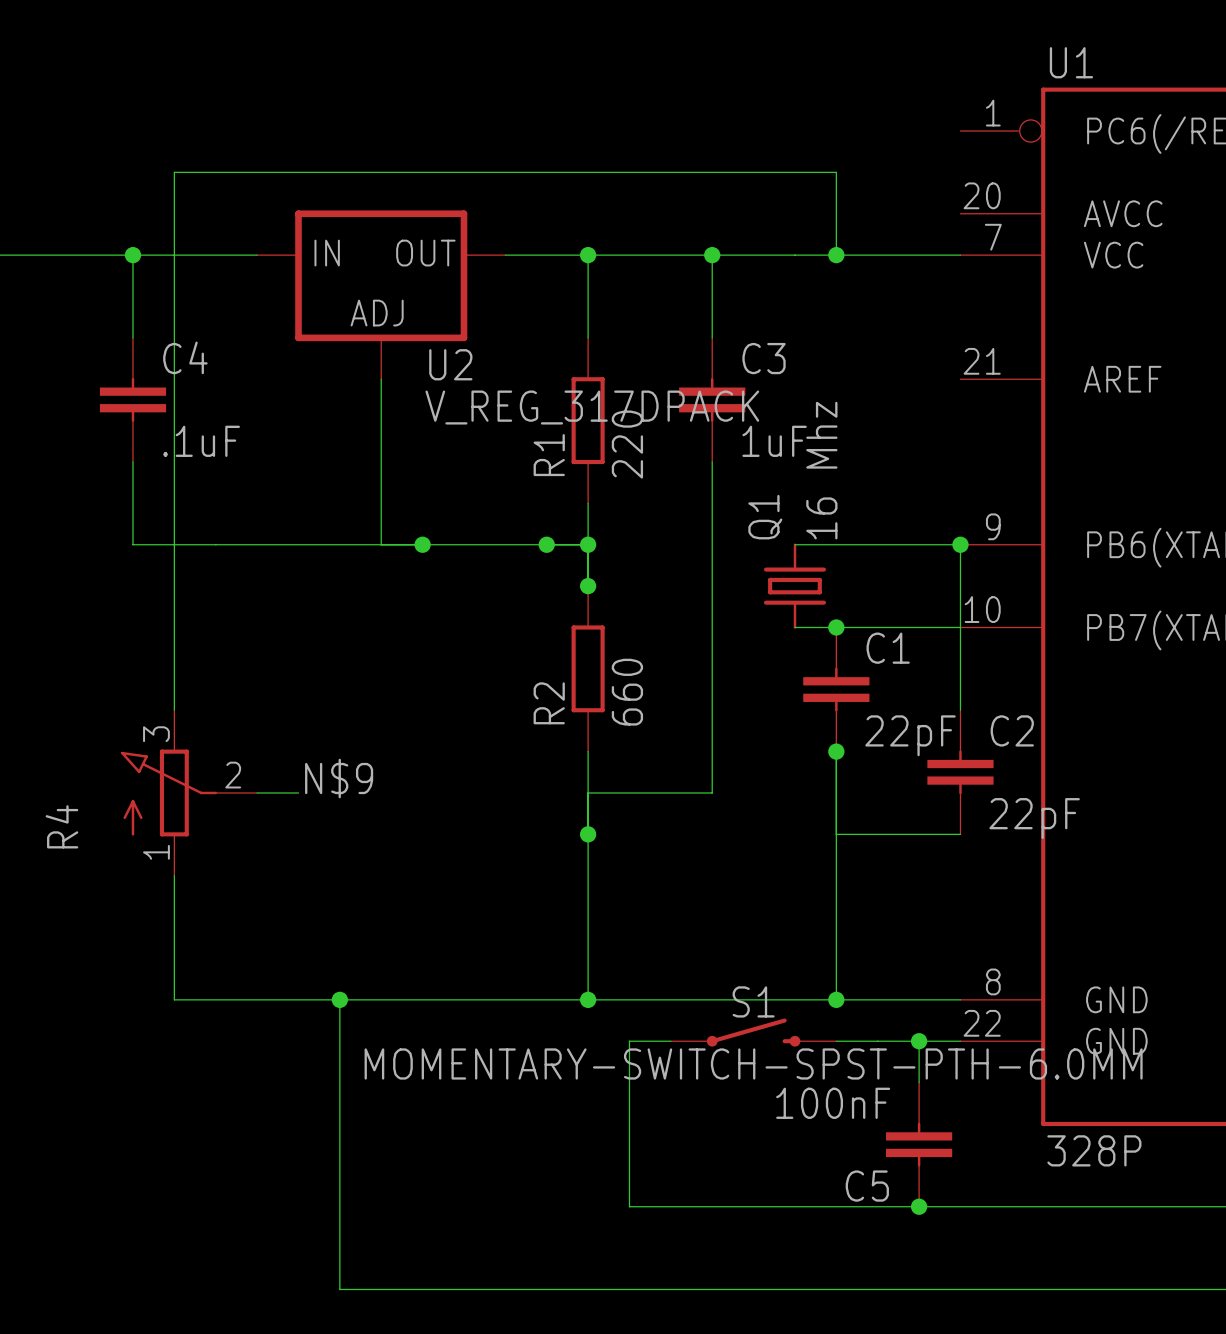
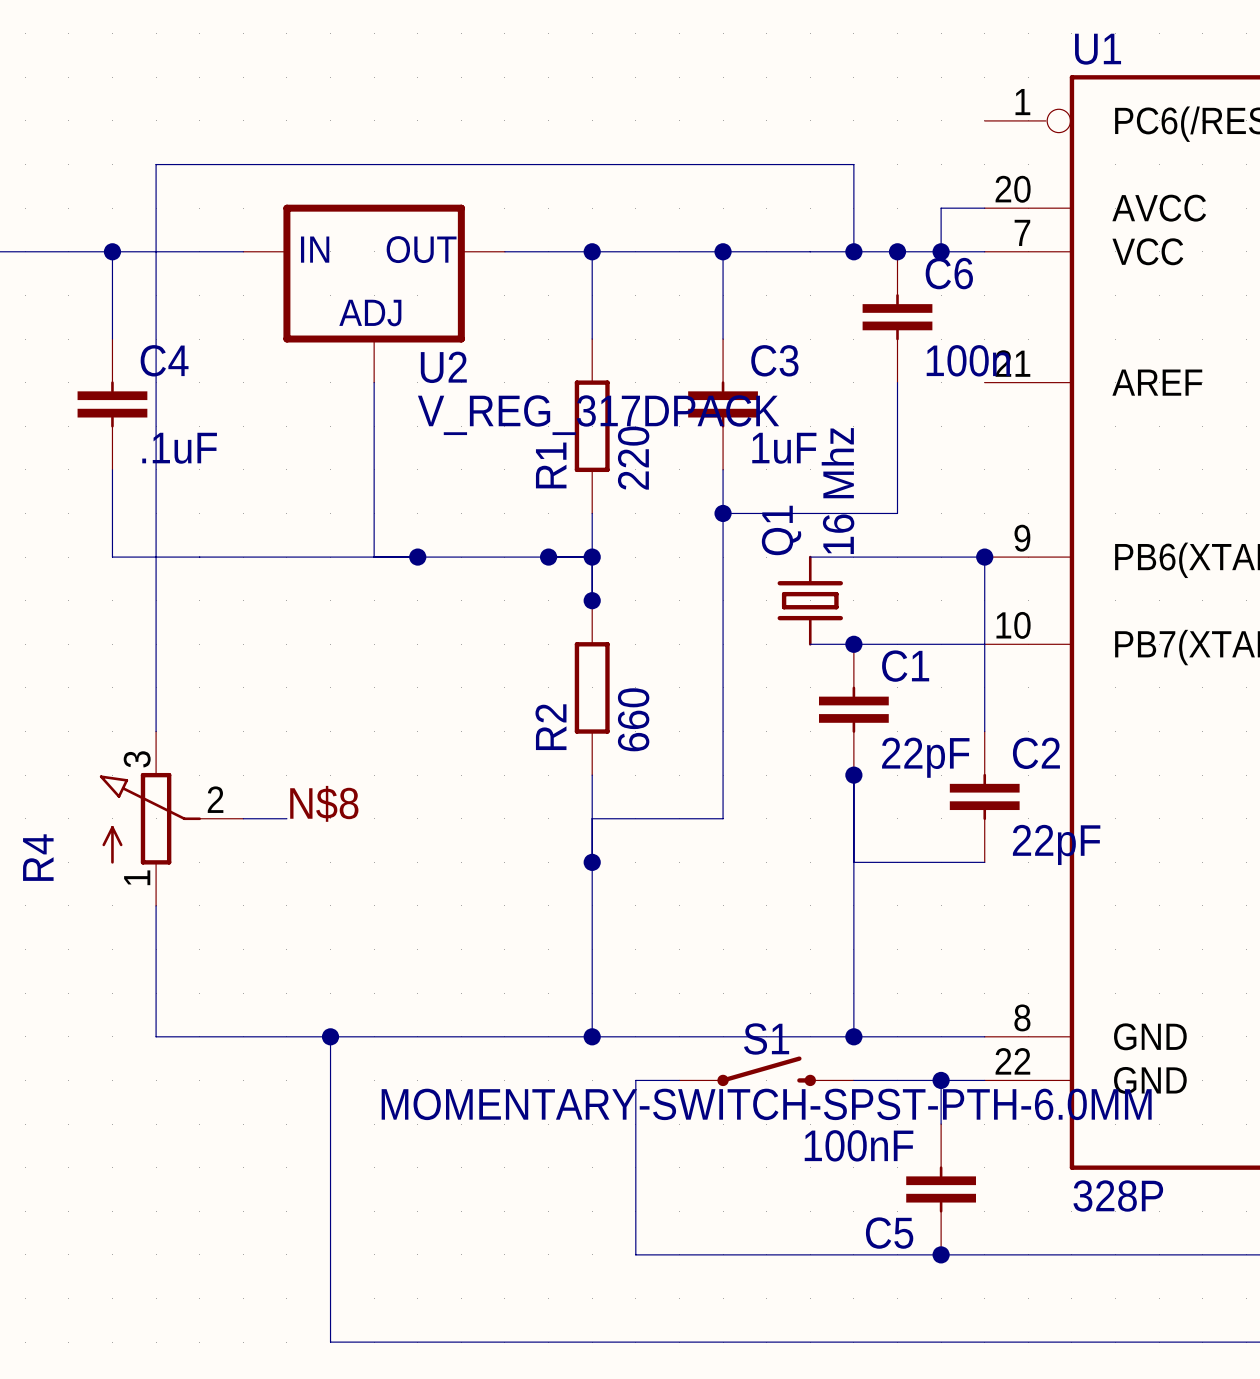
wire: none -> (984, 208) (941, 208) (941, 251)
junction: none -> (897, 251)
junction: none -> (941, 251)
C6: none -> 100n (897, 317)
wire: none -> (897, 382) (897, 513) (723, 513)
junction: none -> (723, 513)
label: N$9 (339, 778) -> N$8 (324, 803)

